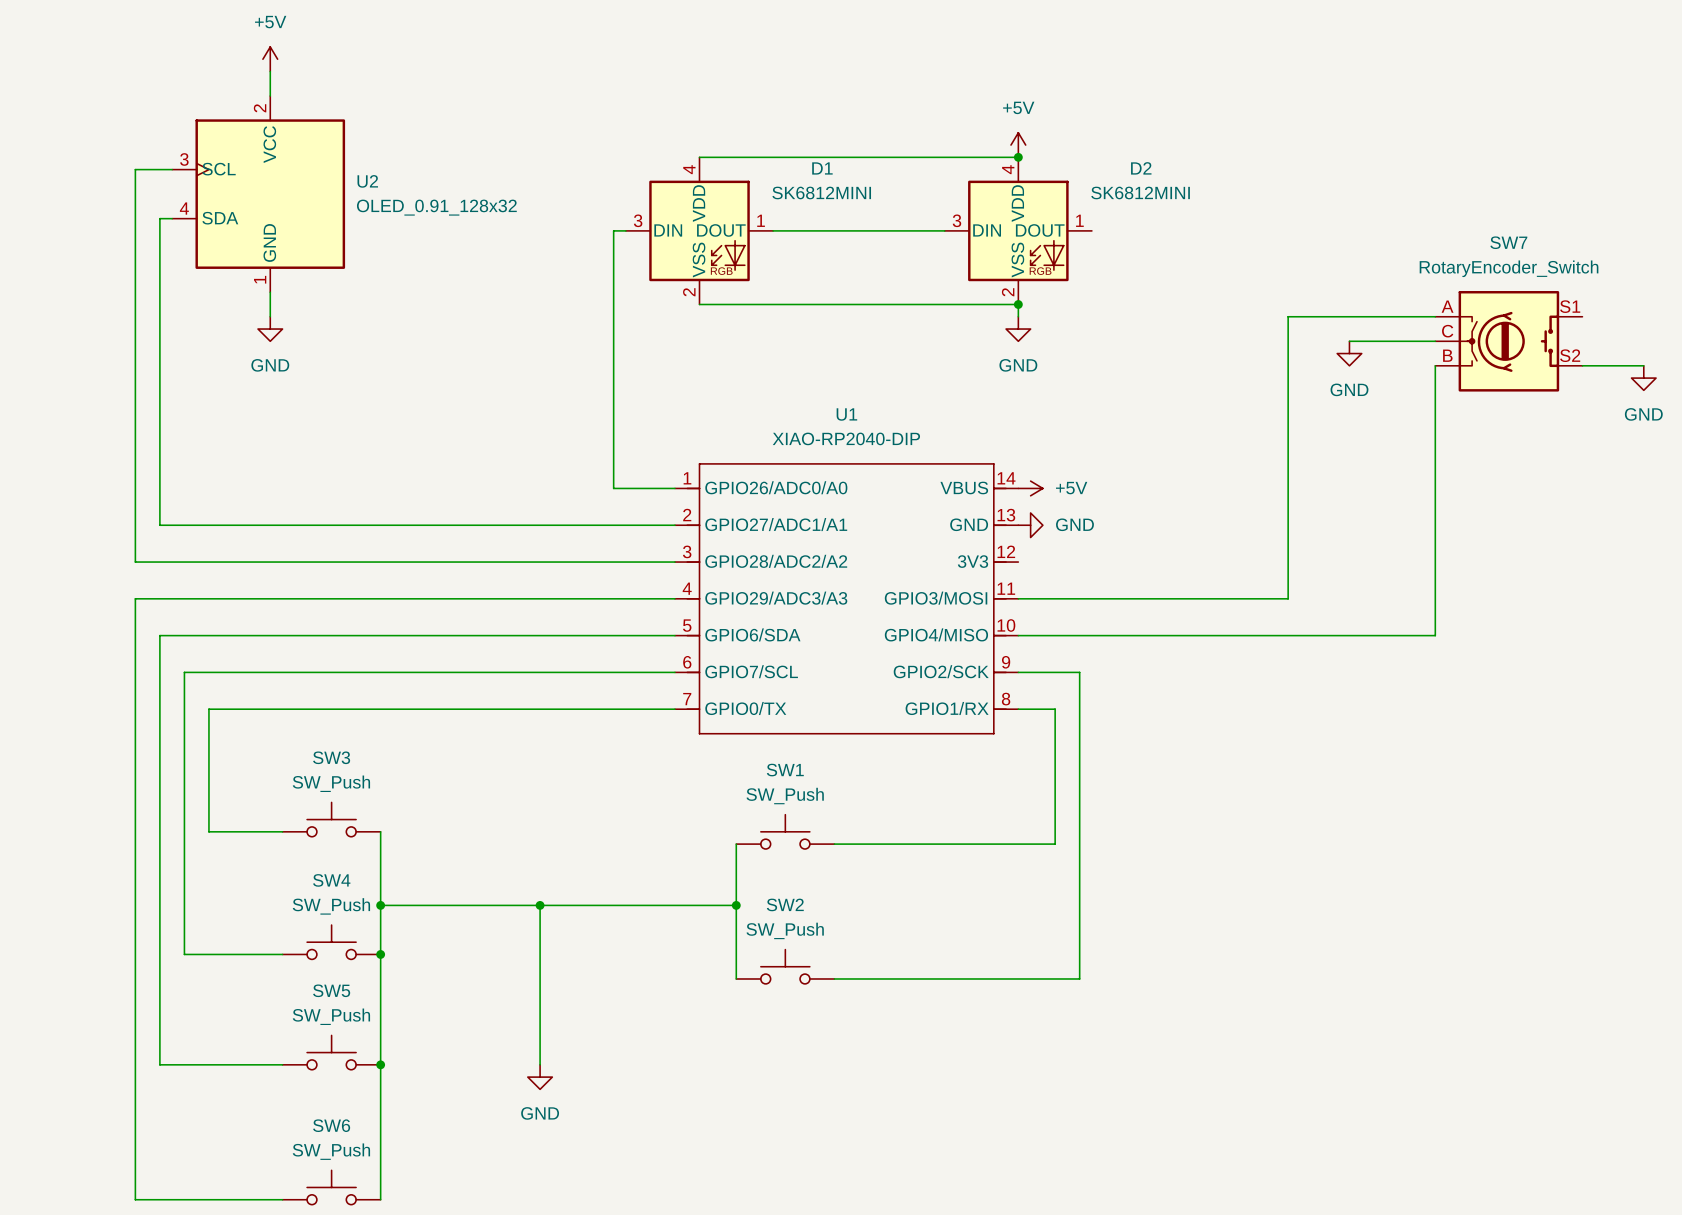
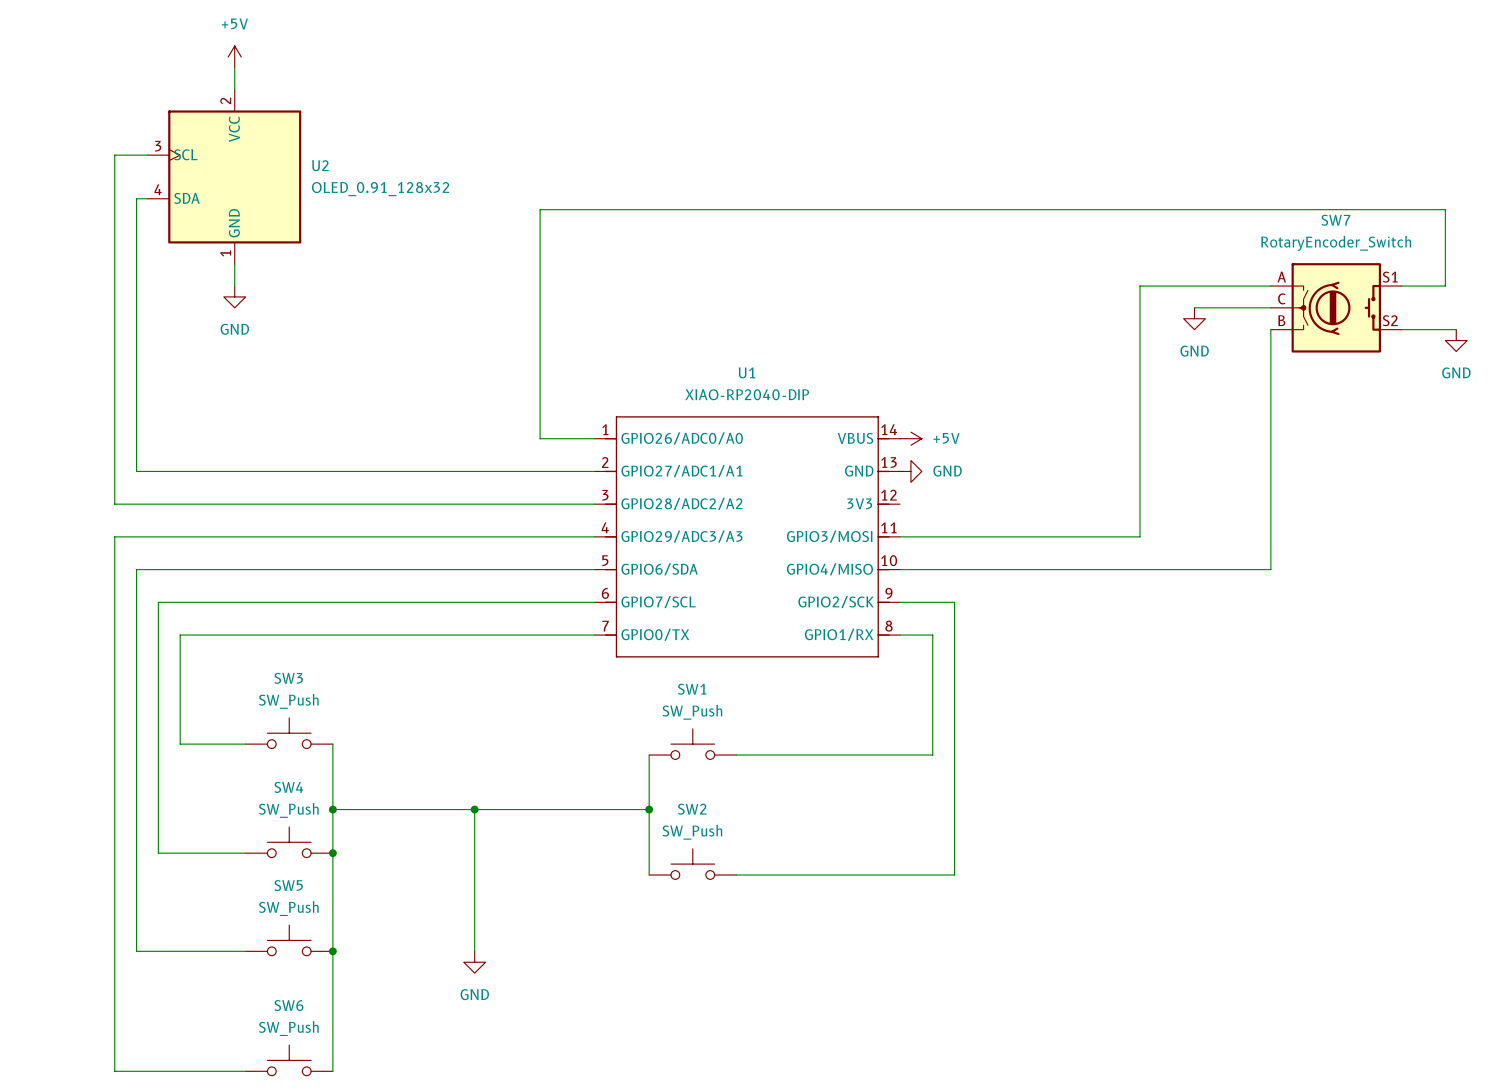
power symbol: +5V (1018, 145) -> none
wire: (699, 157) (1018, 157) -> none
junction: (1018, 157) -> none
D1: SK6812MINI (699, 230) -> none
wire: none -> (834, 209) (1445, 209) (1445, 286) (1401, 286)
D2: SK6812MINI (1018, 230) -> none
wire: (699, 304) (1018, 304) (1018, 316) -> none
junction: (1018, 304) -> none
power symbol: GND (1018, 329) -> none

